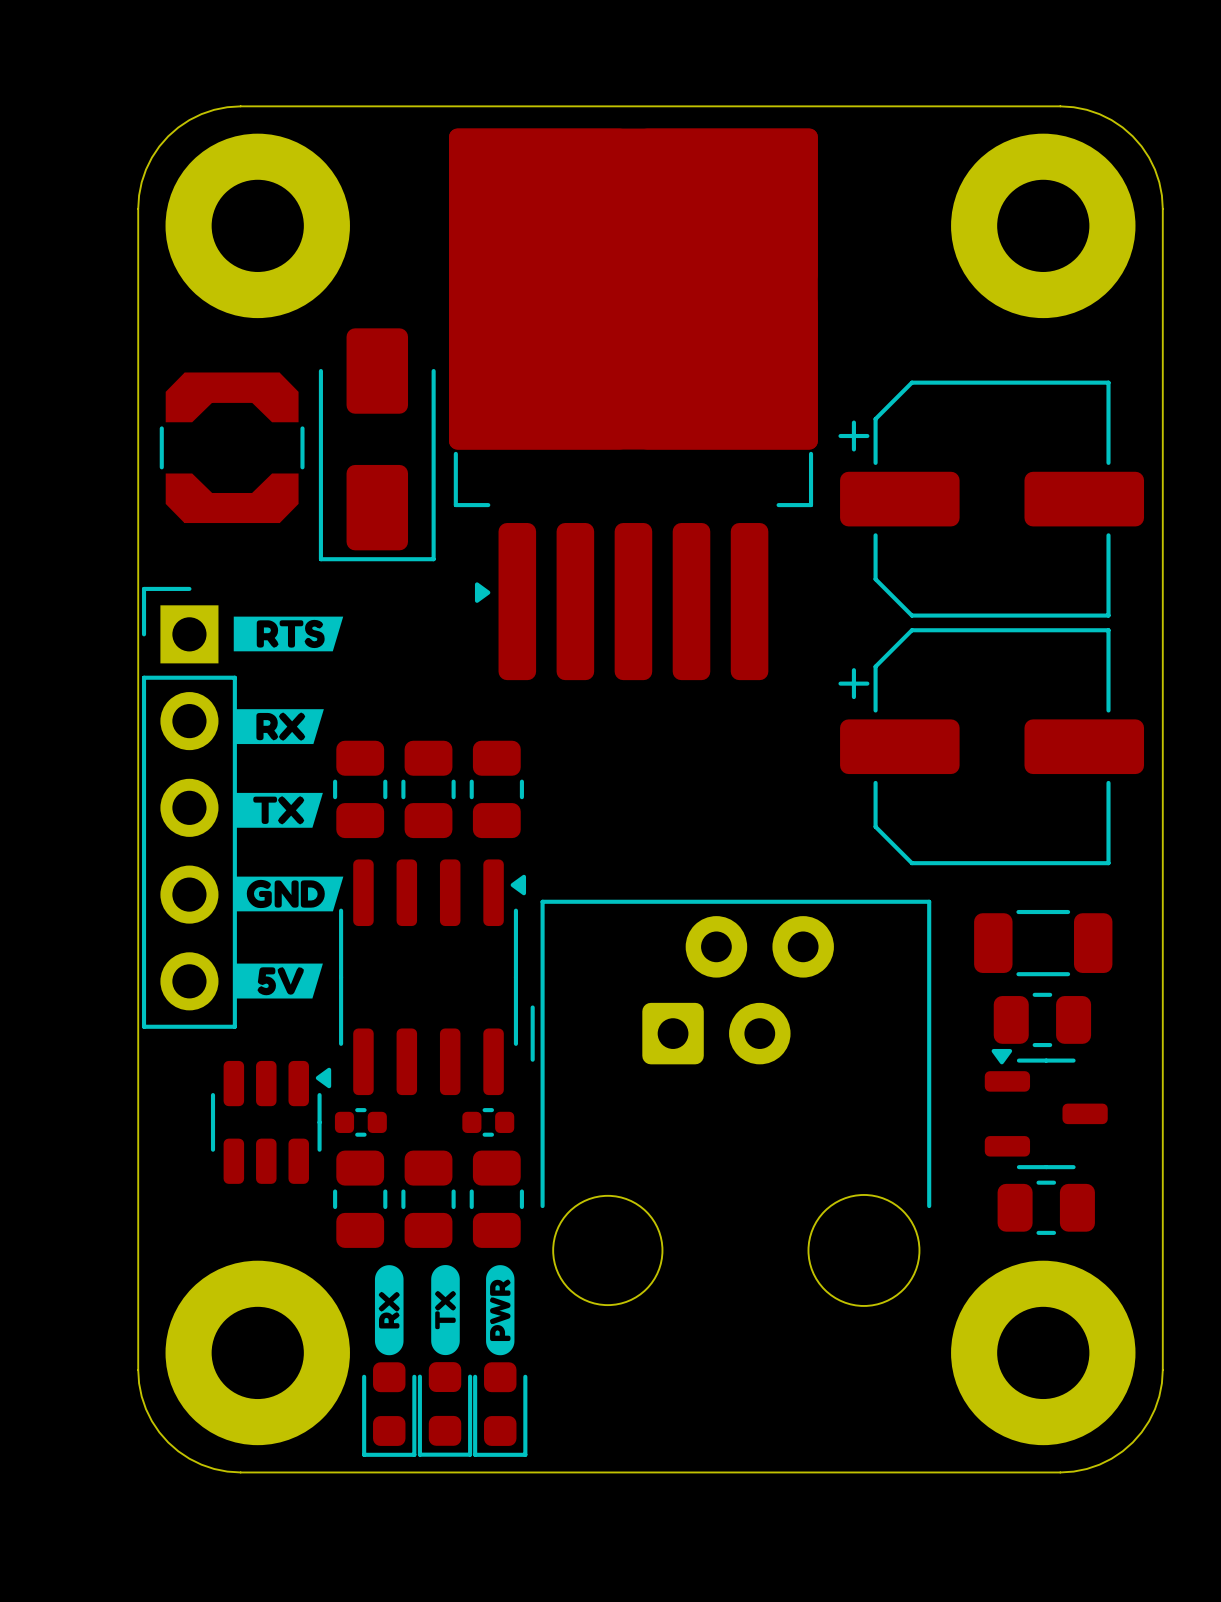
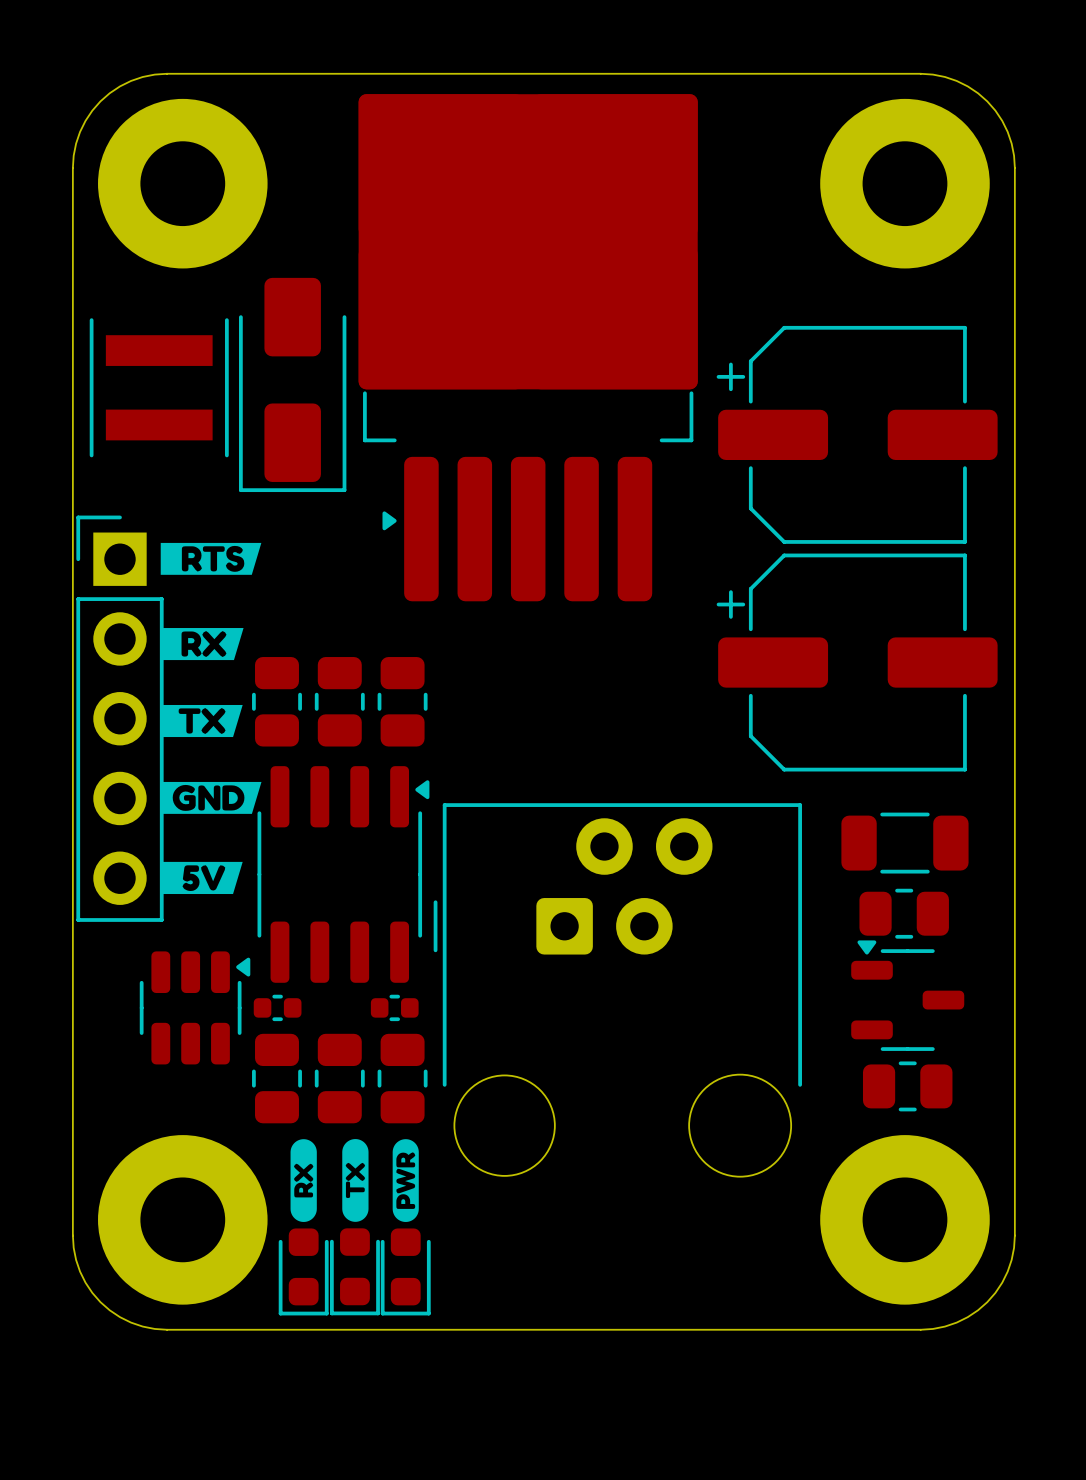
part footprint: [159, 372, 305, 524] -> [89, 318, 229, 458]

